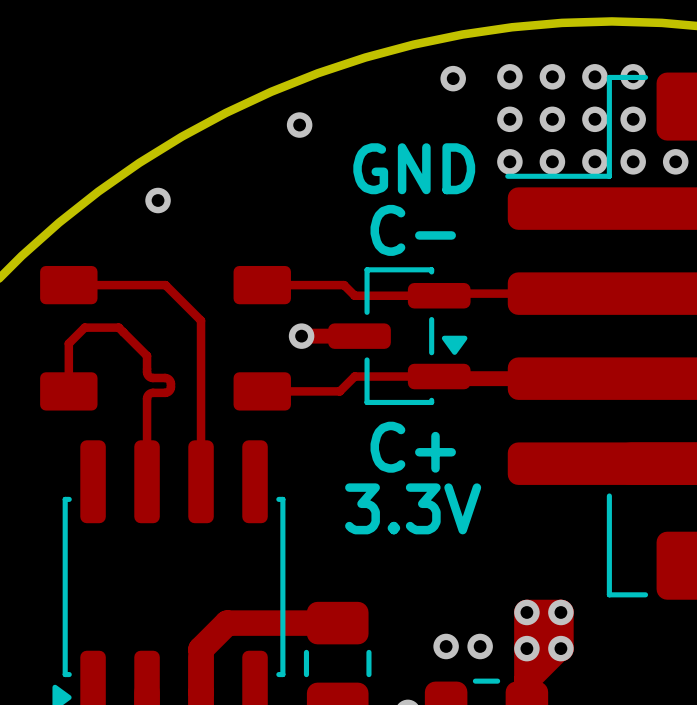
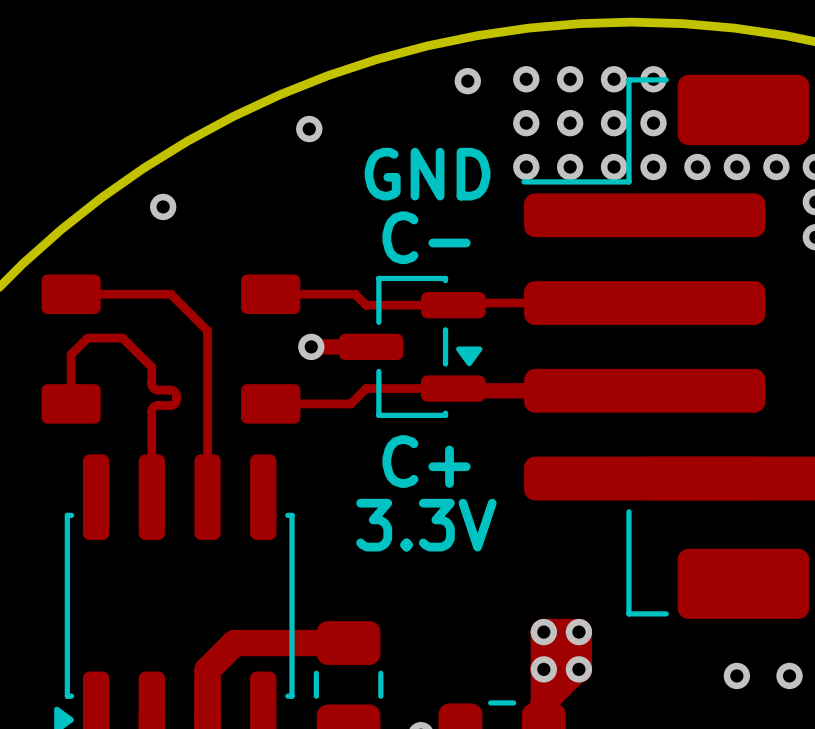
via: (446, 646) -> none
via: (480, 646) -> none

